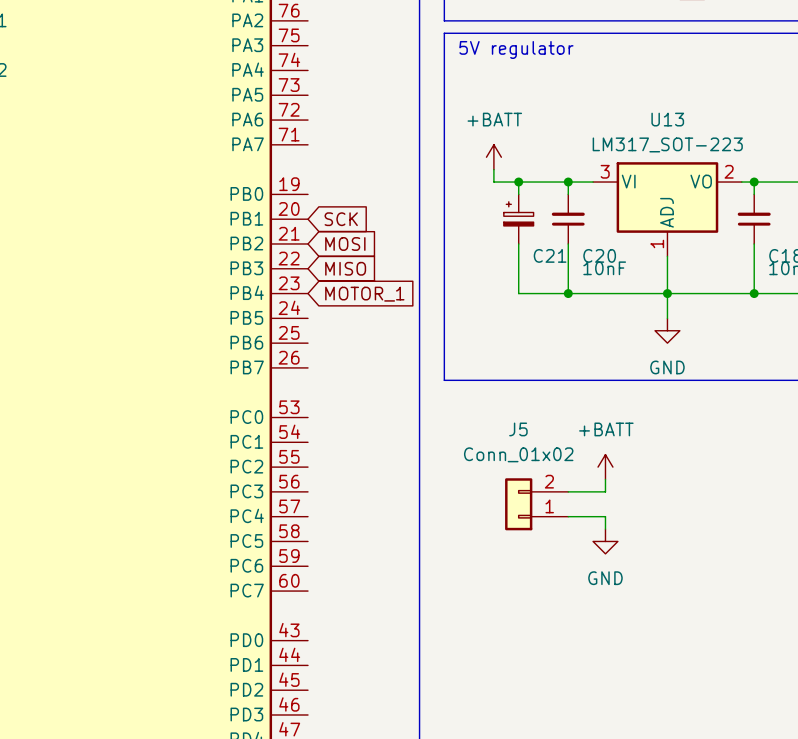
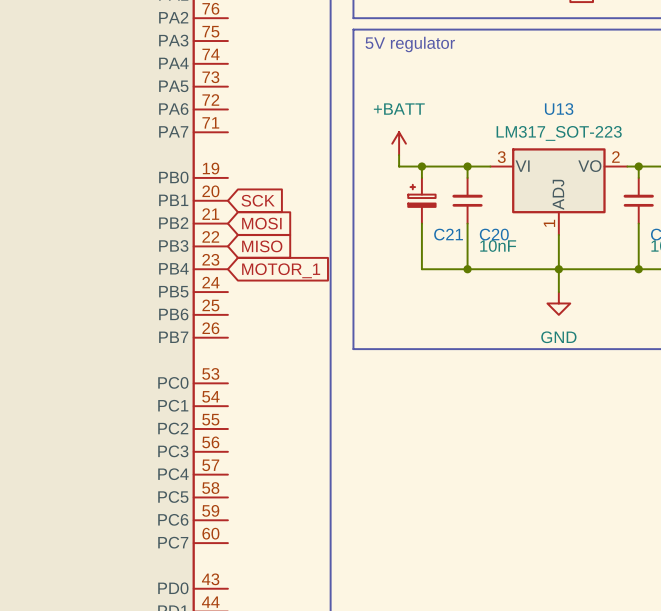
power symbol: +BATT (605, 467) -> none
wire: (605, 479) (605, 491) (568, 491) -> none
J5: Conn_01x02 (536, 504) -> none
wire: (568, 516) (605, 516) (605, 529) -> none
power symbol: GND (605, 541) -> none

